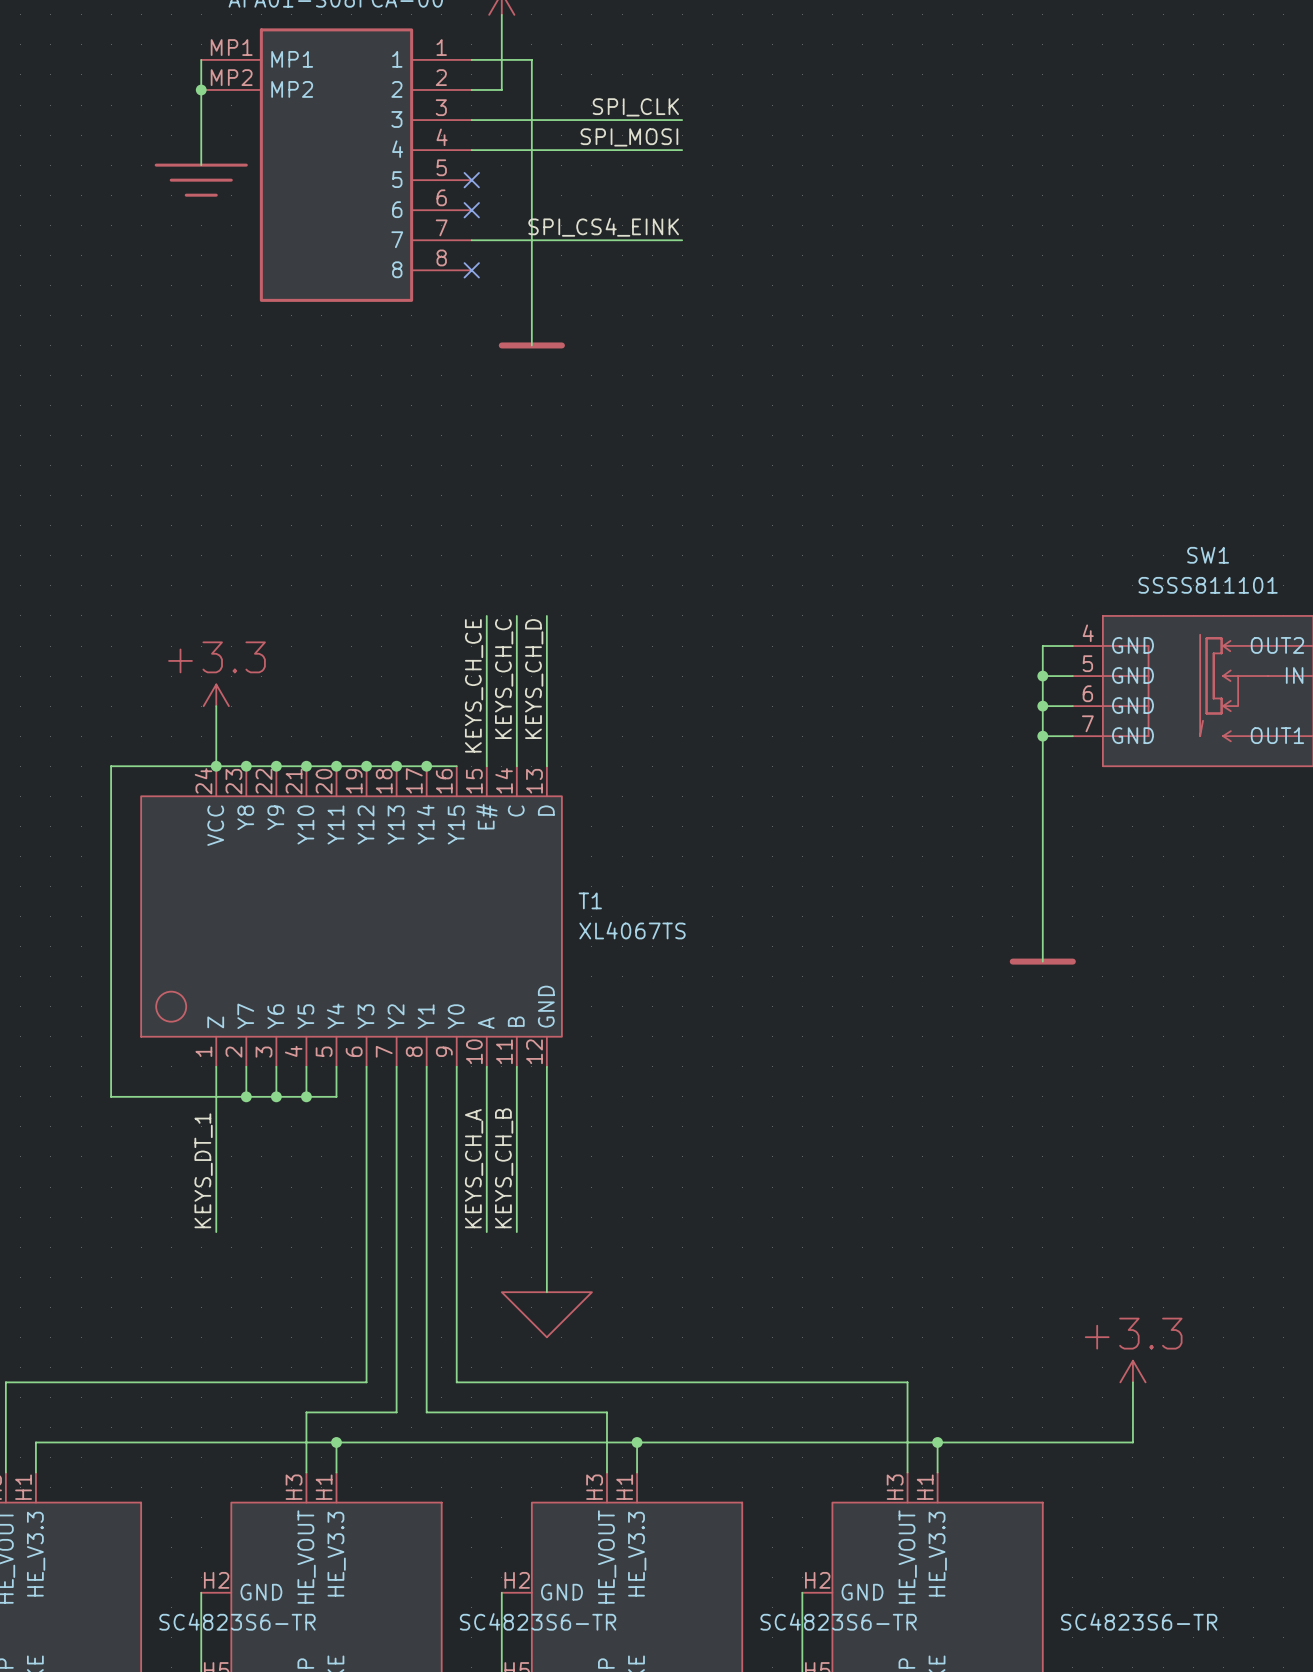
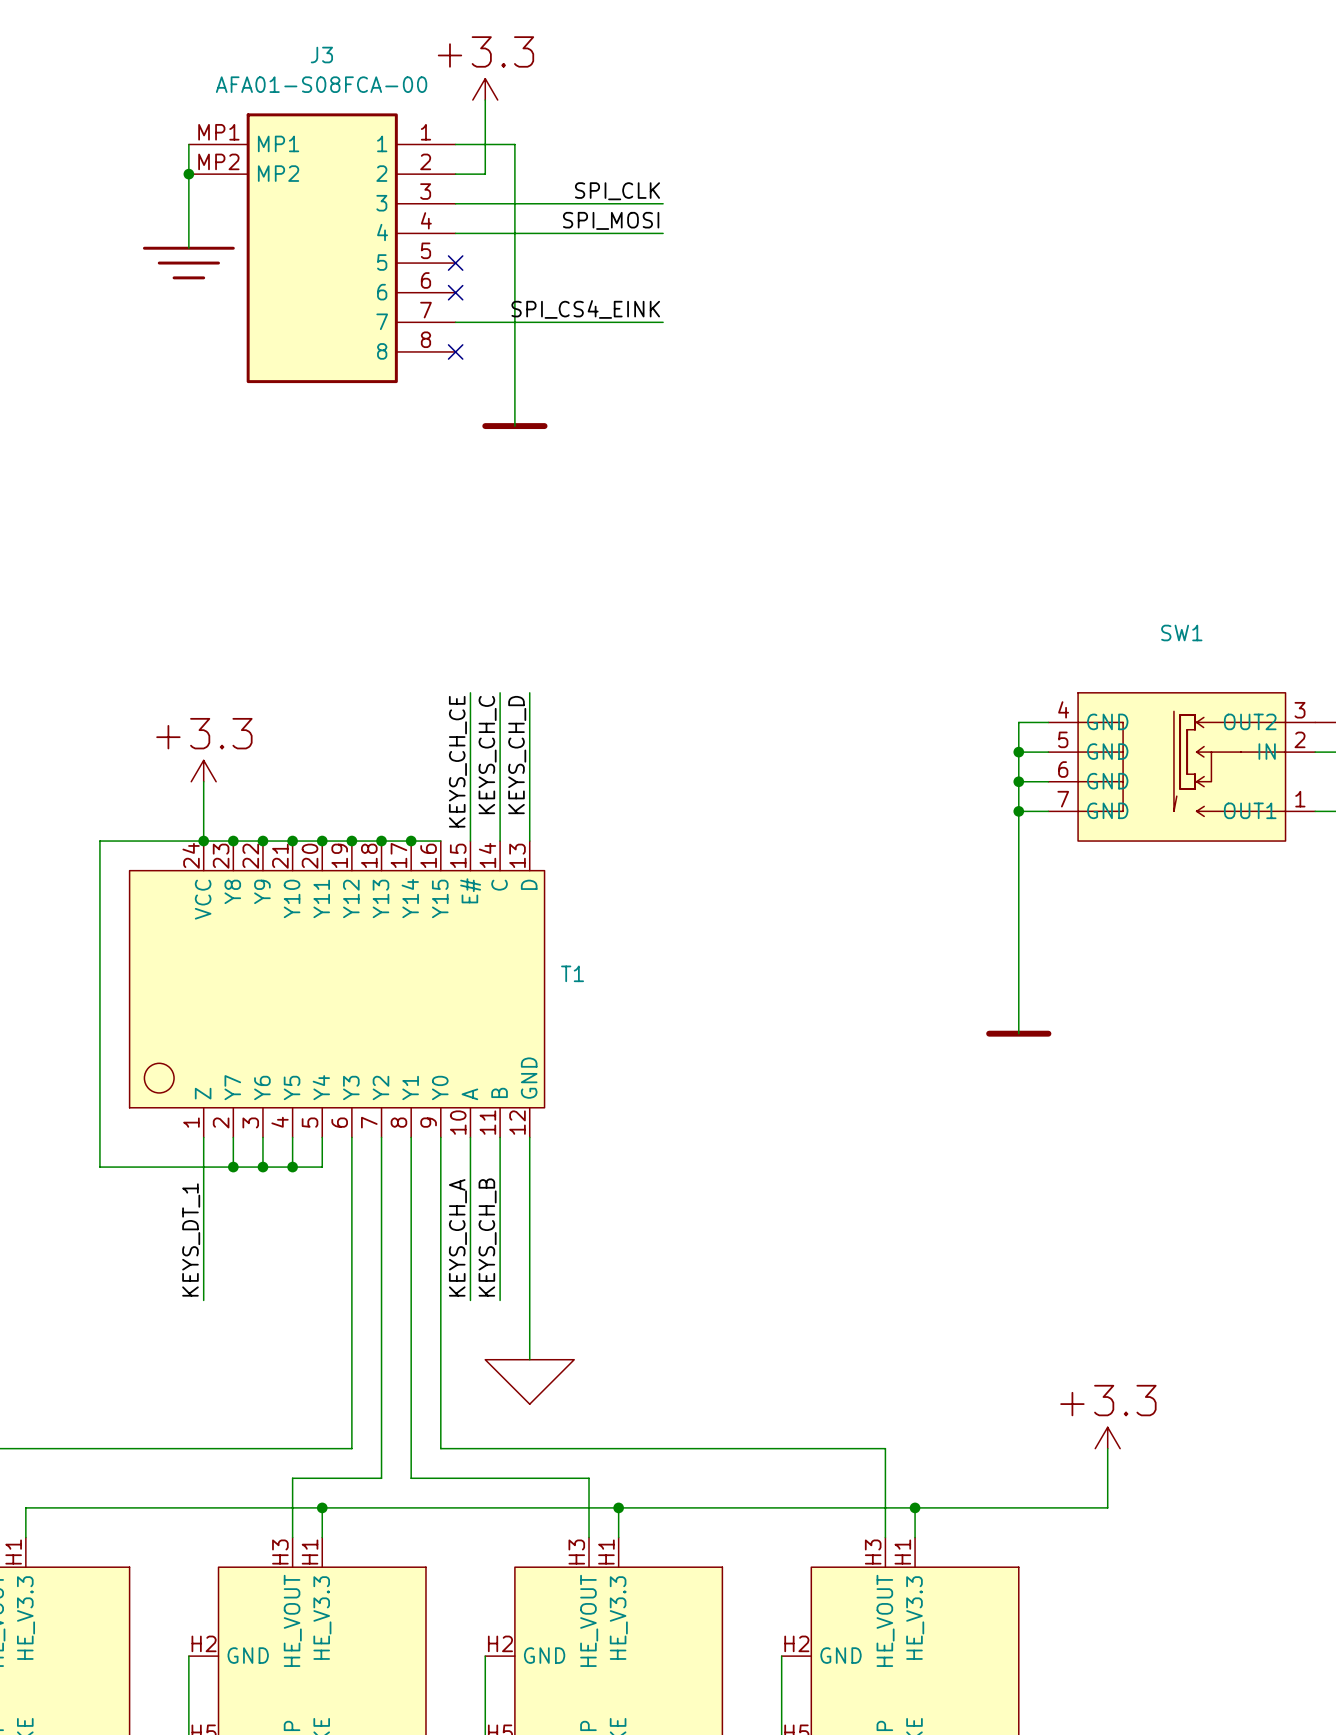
SW1 value: SSSS811101 (1208, 585) -> none
T1 value: XL4067TS (632, 930) -> none
part value: SC4823S6-TR (237, 1621) -> none
part value: SC4823S6-TR (538, 1621) -> none
part value: SC4823S6-TR (838, 1621) -> none
part value: SC4823S6-TR (1139, 1621) -> none

